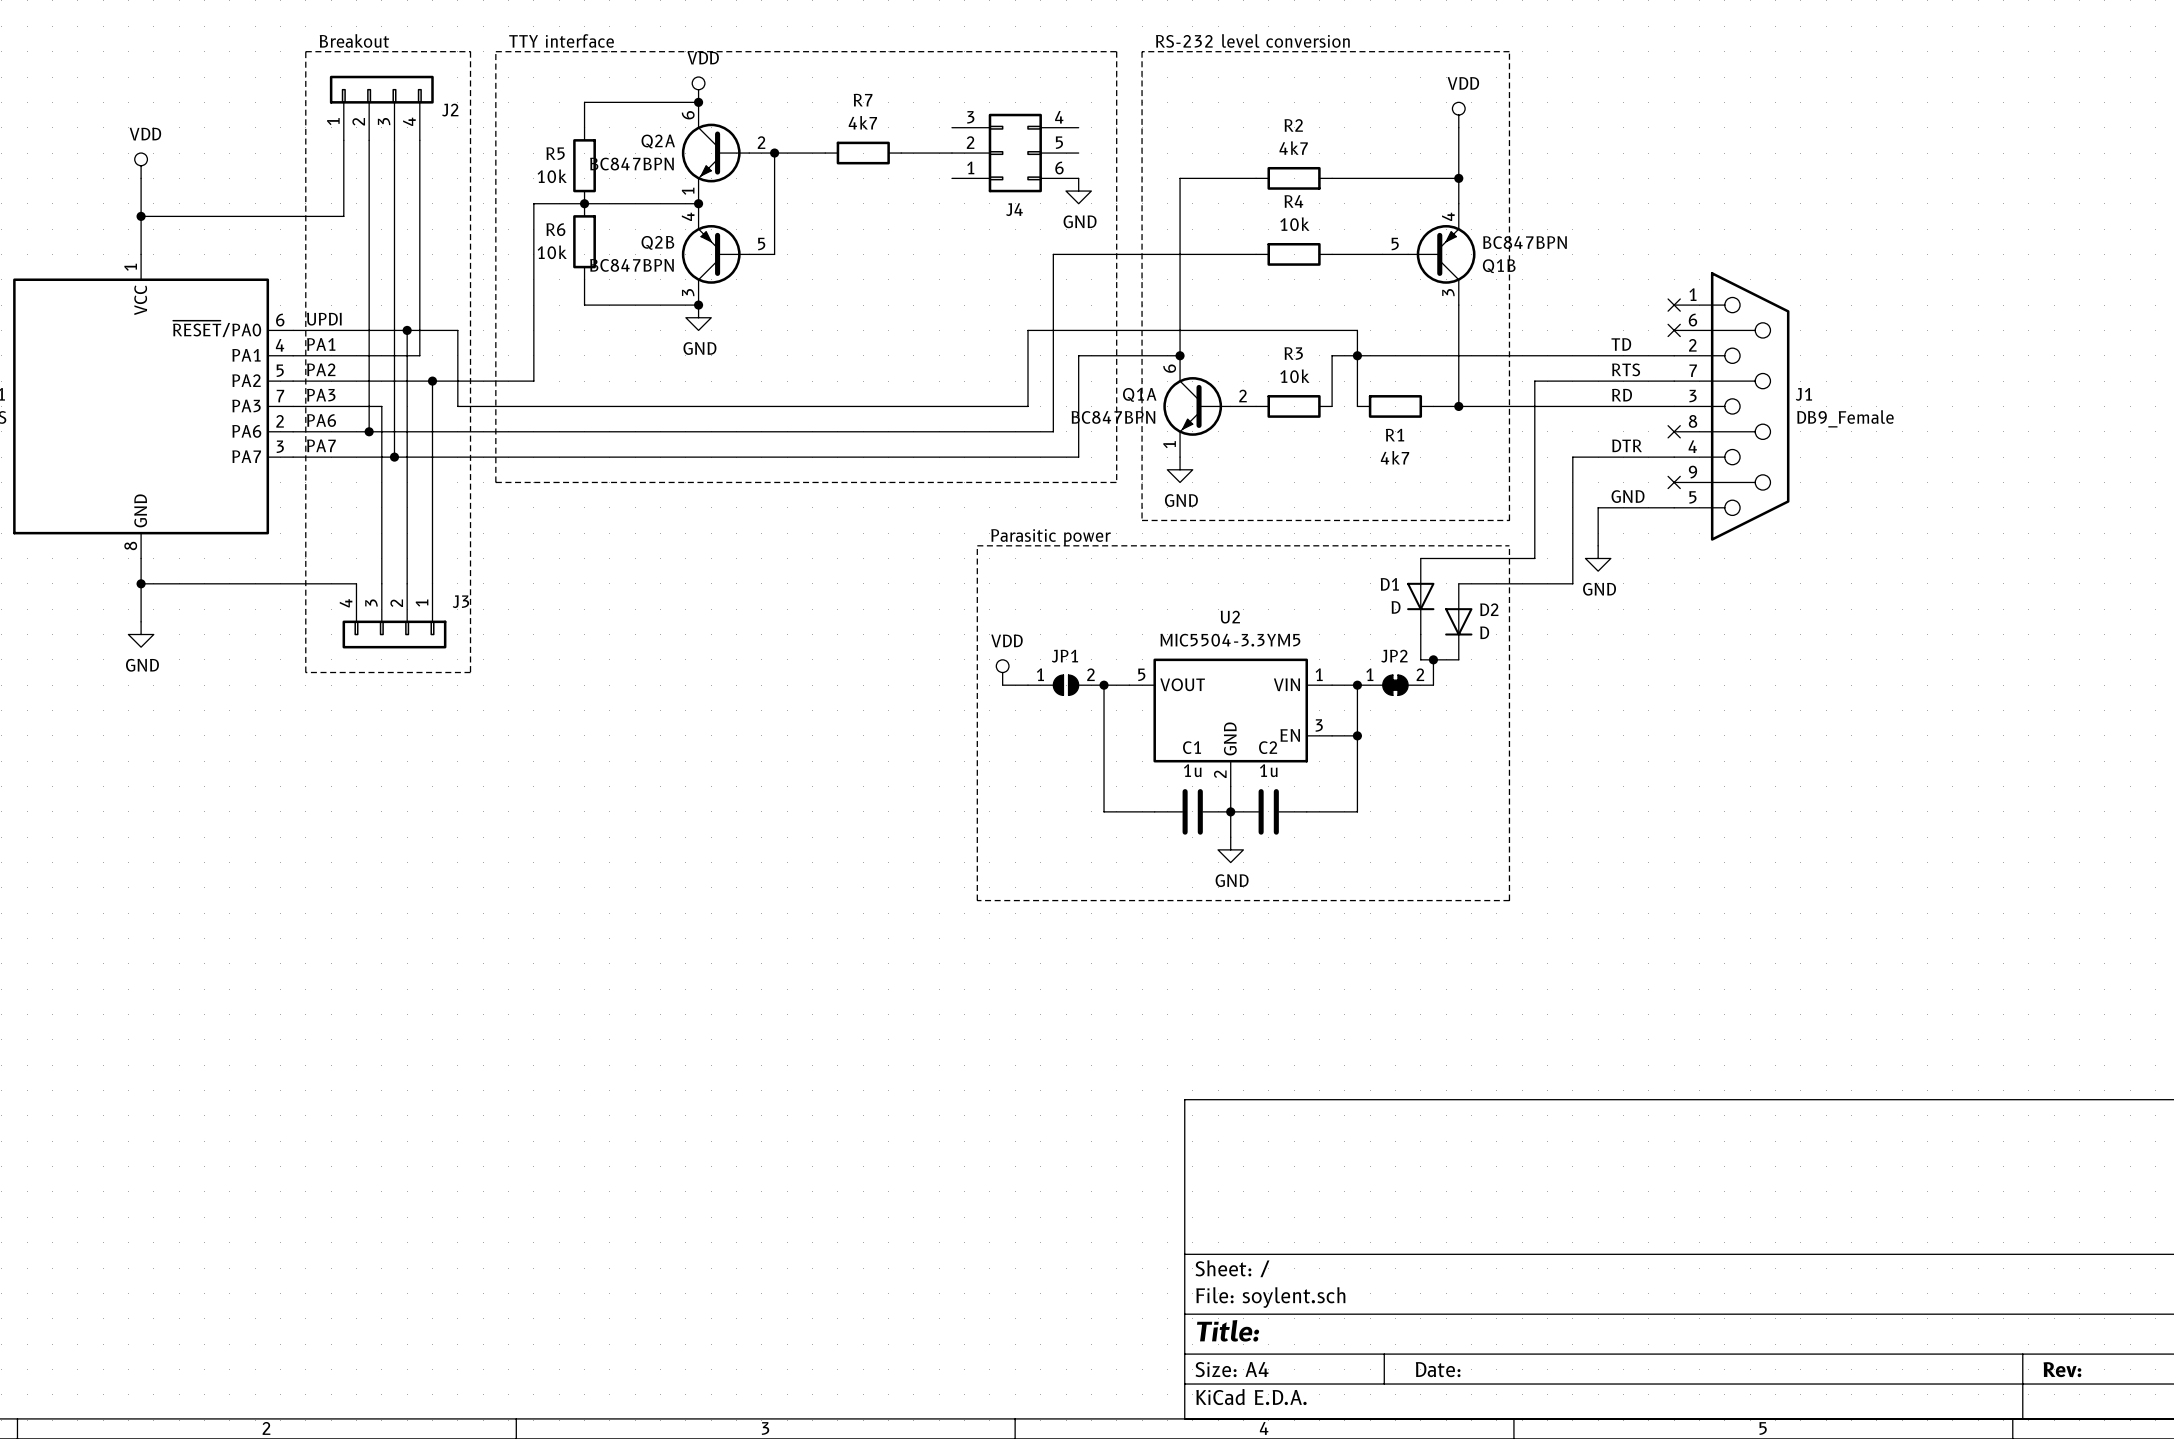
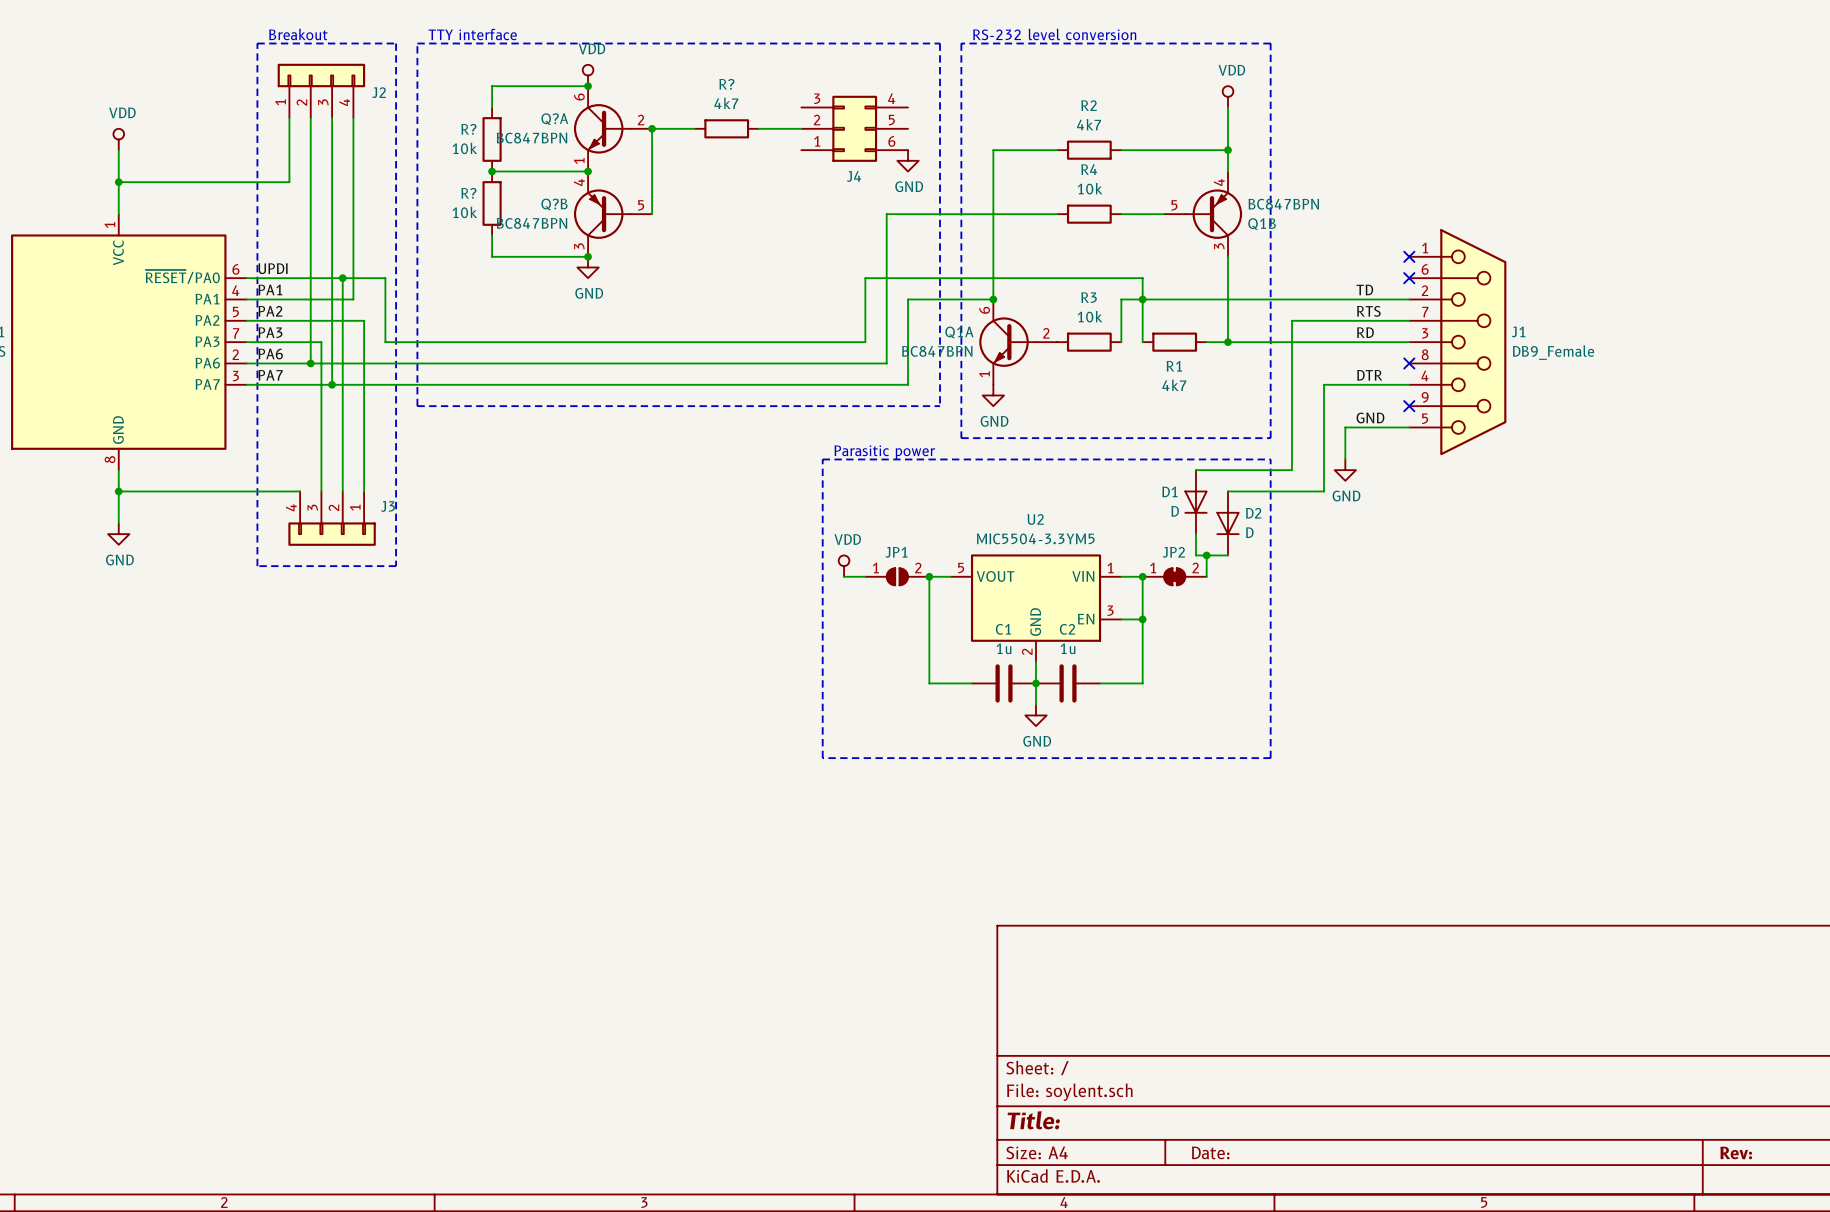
R7 name: R7 (863, 100) -> R? (726, 84)
Q2A name: Q2A (658, 141) -> Q?A (554, 119)
R5 name: R5 (555, 153) -> R? (468, 129)
wire: (584, 203) (533, 203) (533, 381) (432, 381) -> none
R6 name: R6 (555, 229) -> R? (468, 193)
Q2B name: Q2B (657, 242) -> Q?B (554, 204)
junction: (432, 381) -> none

